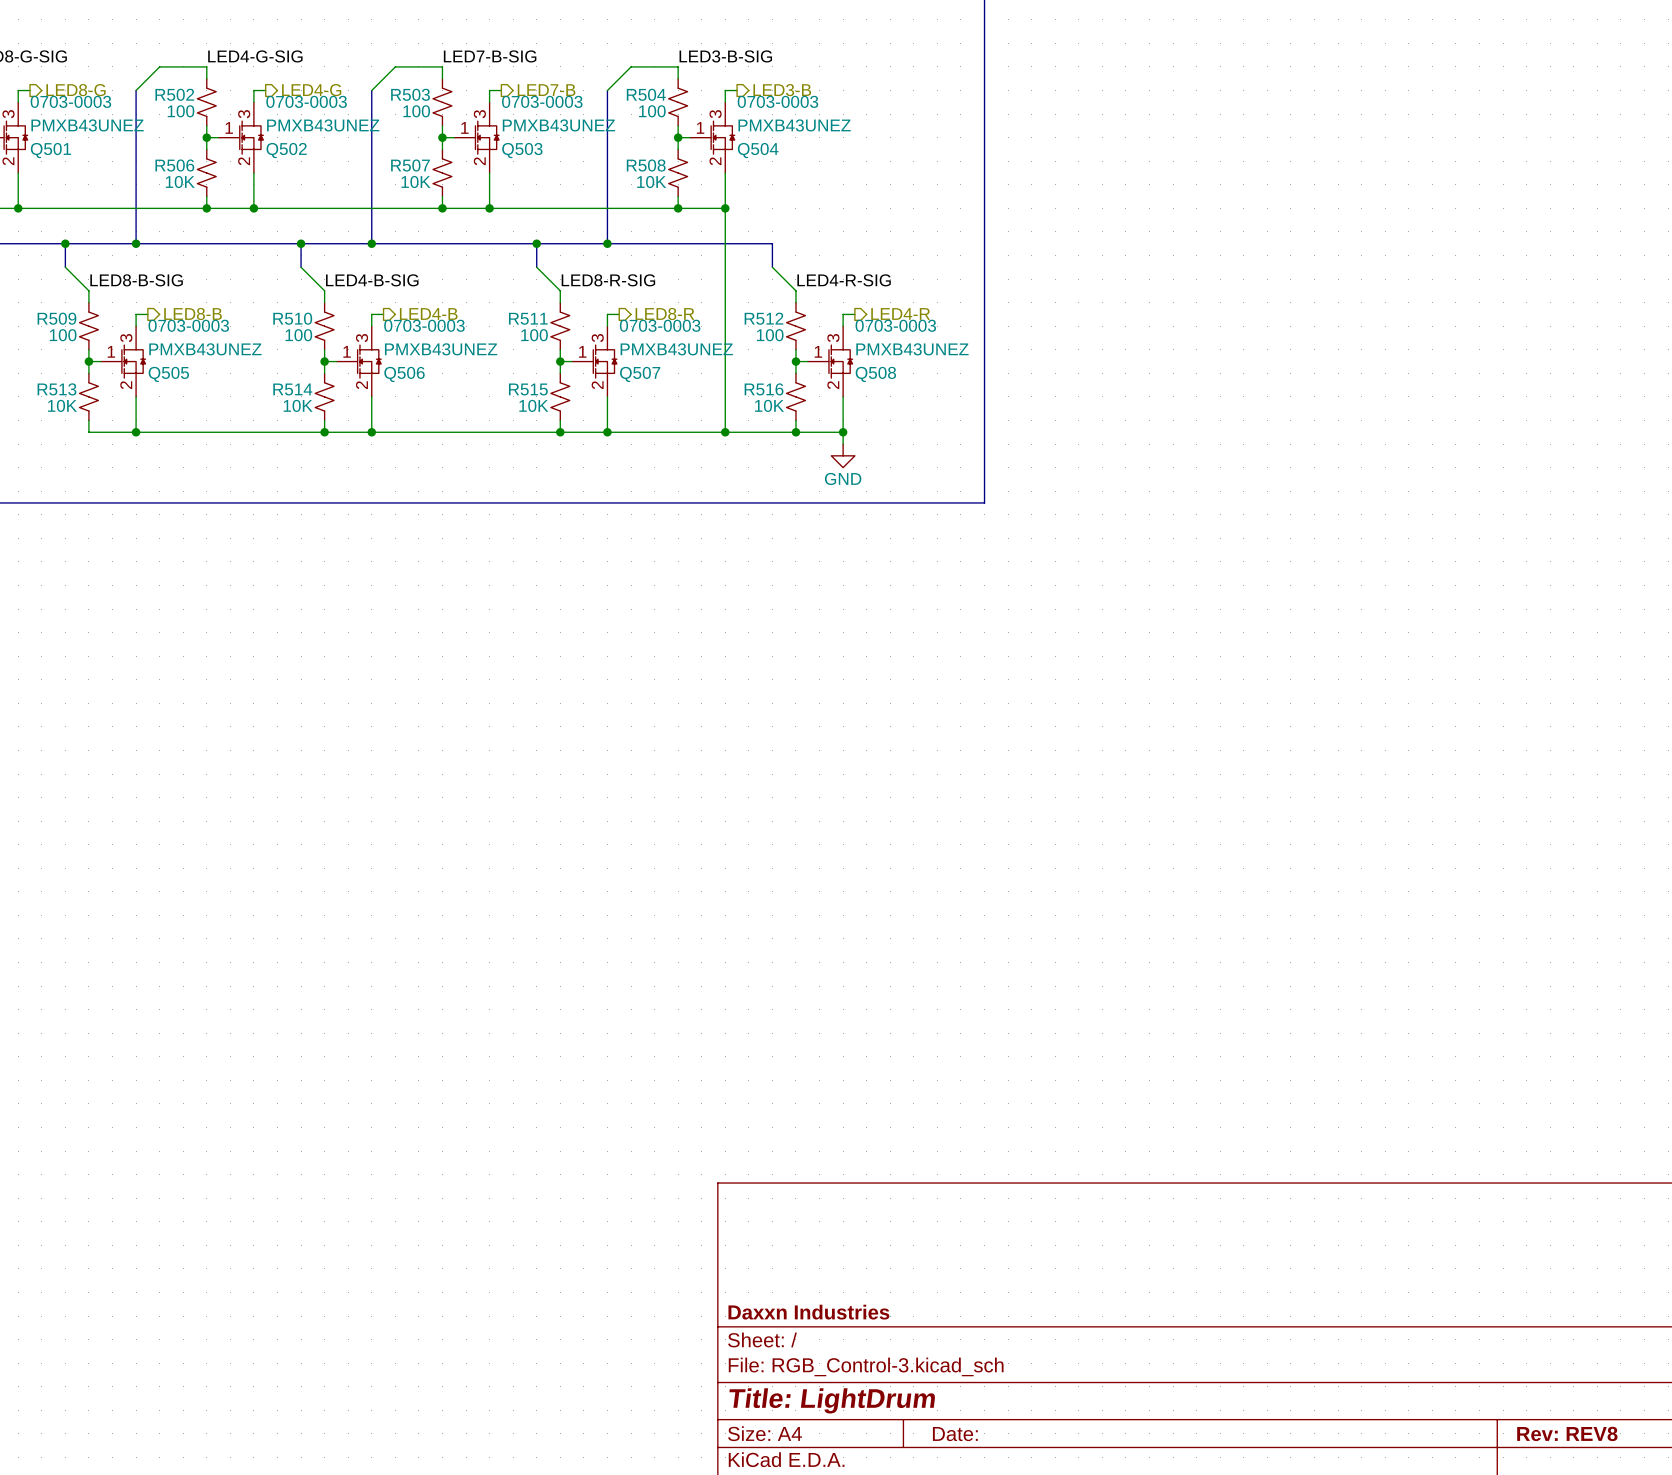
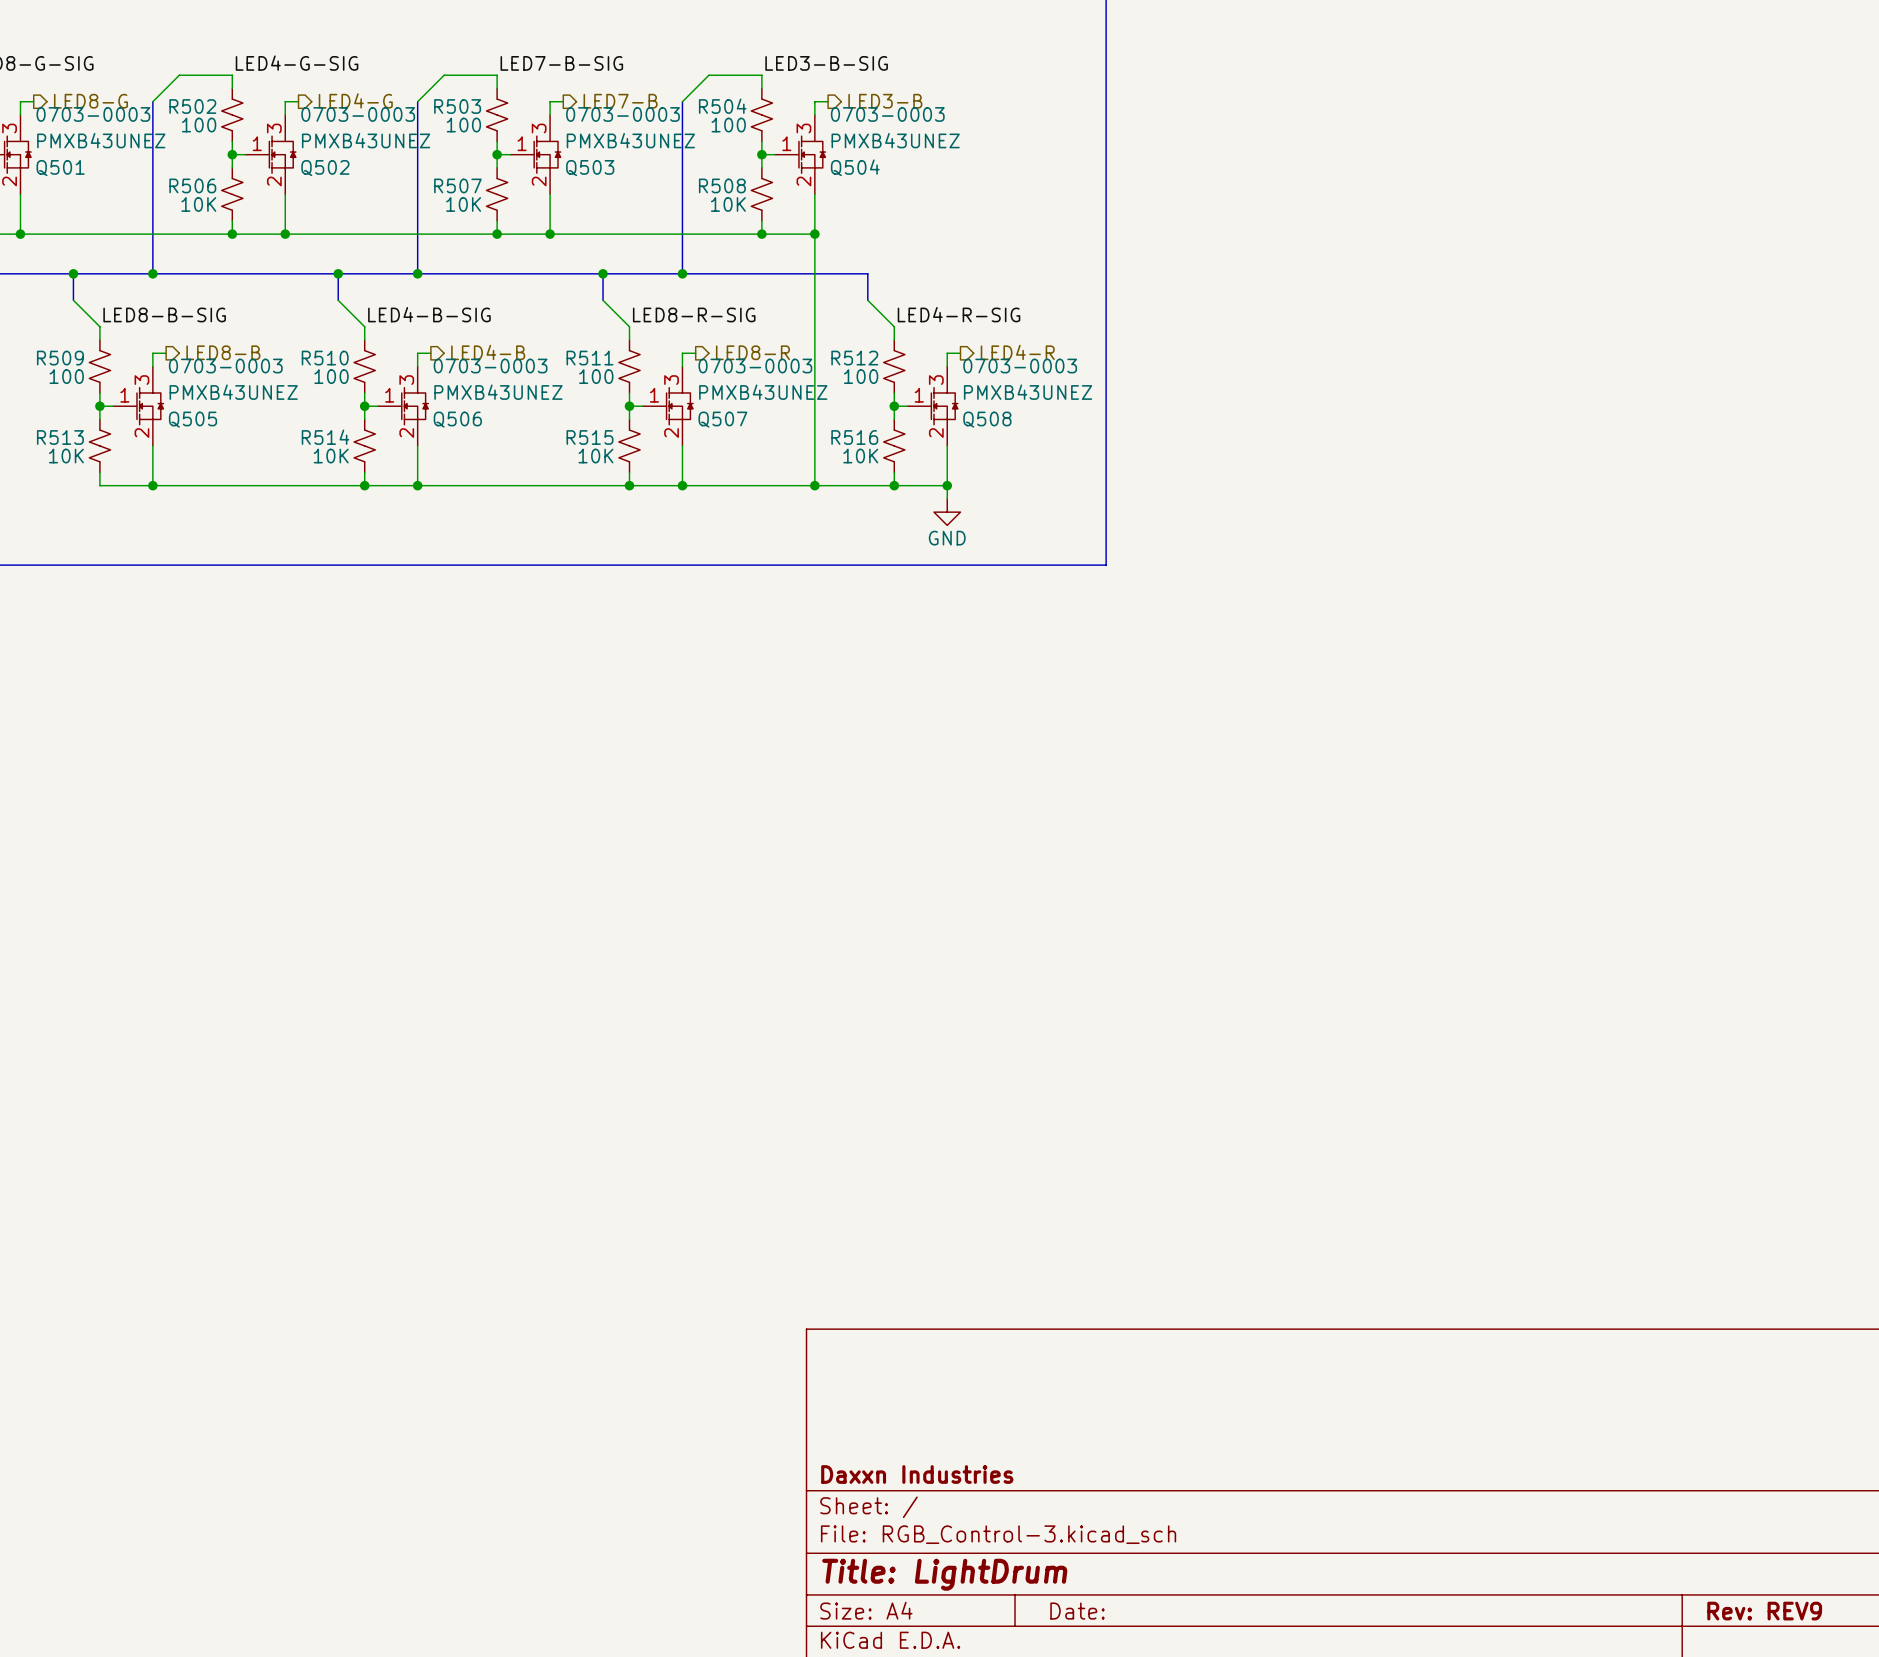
title block: Rev: REV8 (1567, 1433) -> Rev: REV9 (1764, 1611)

